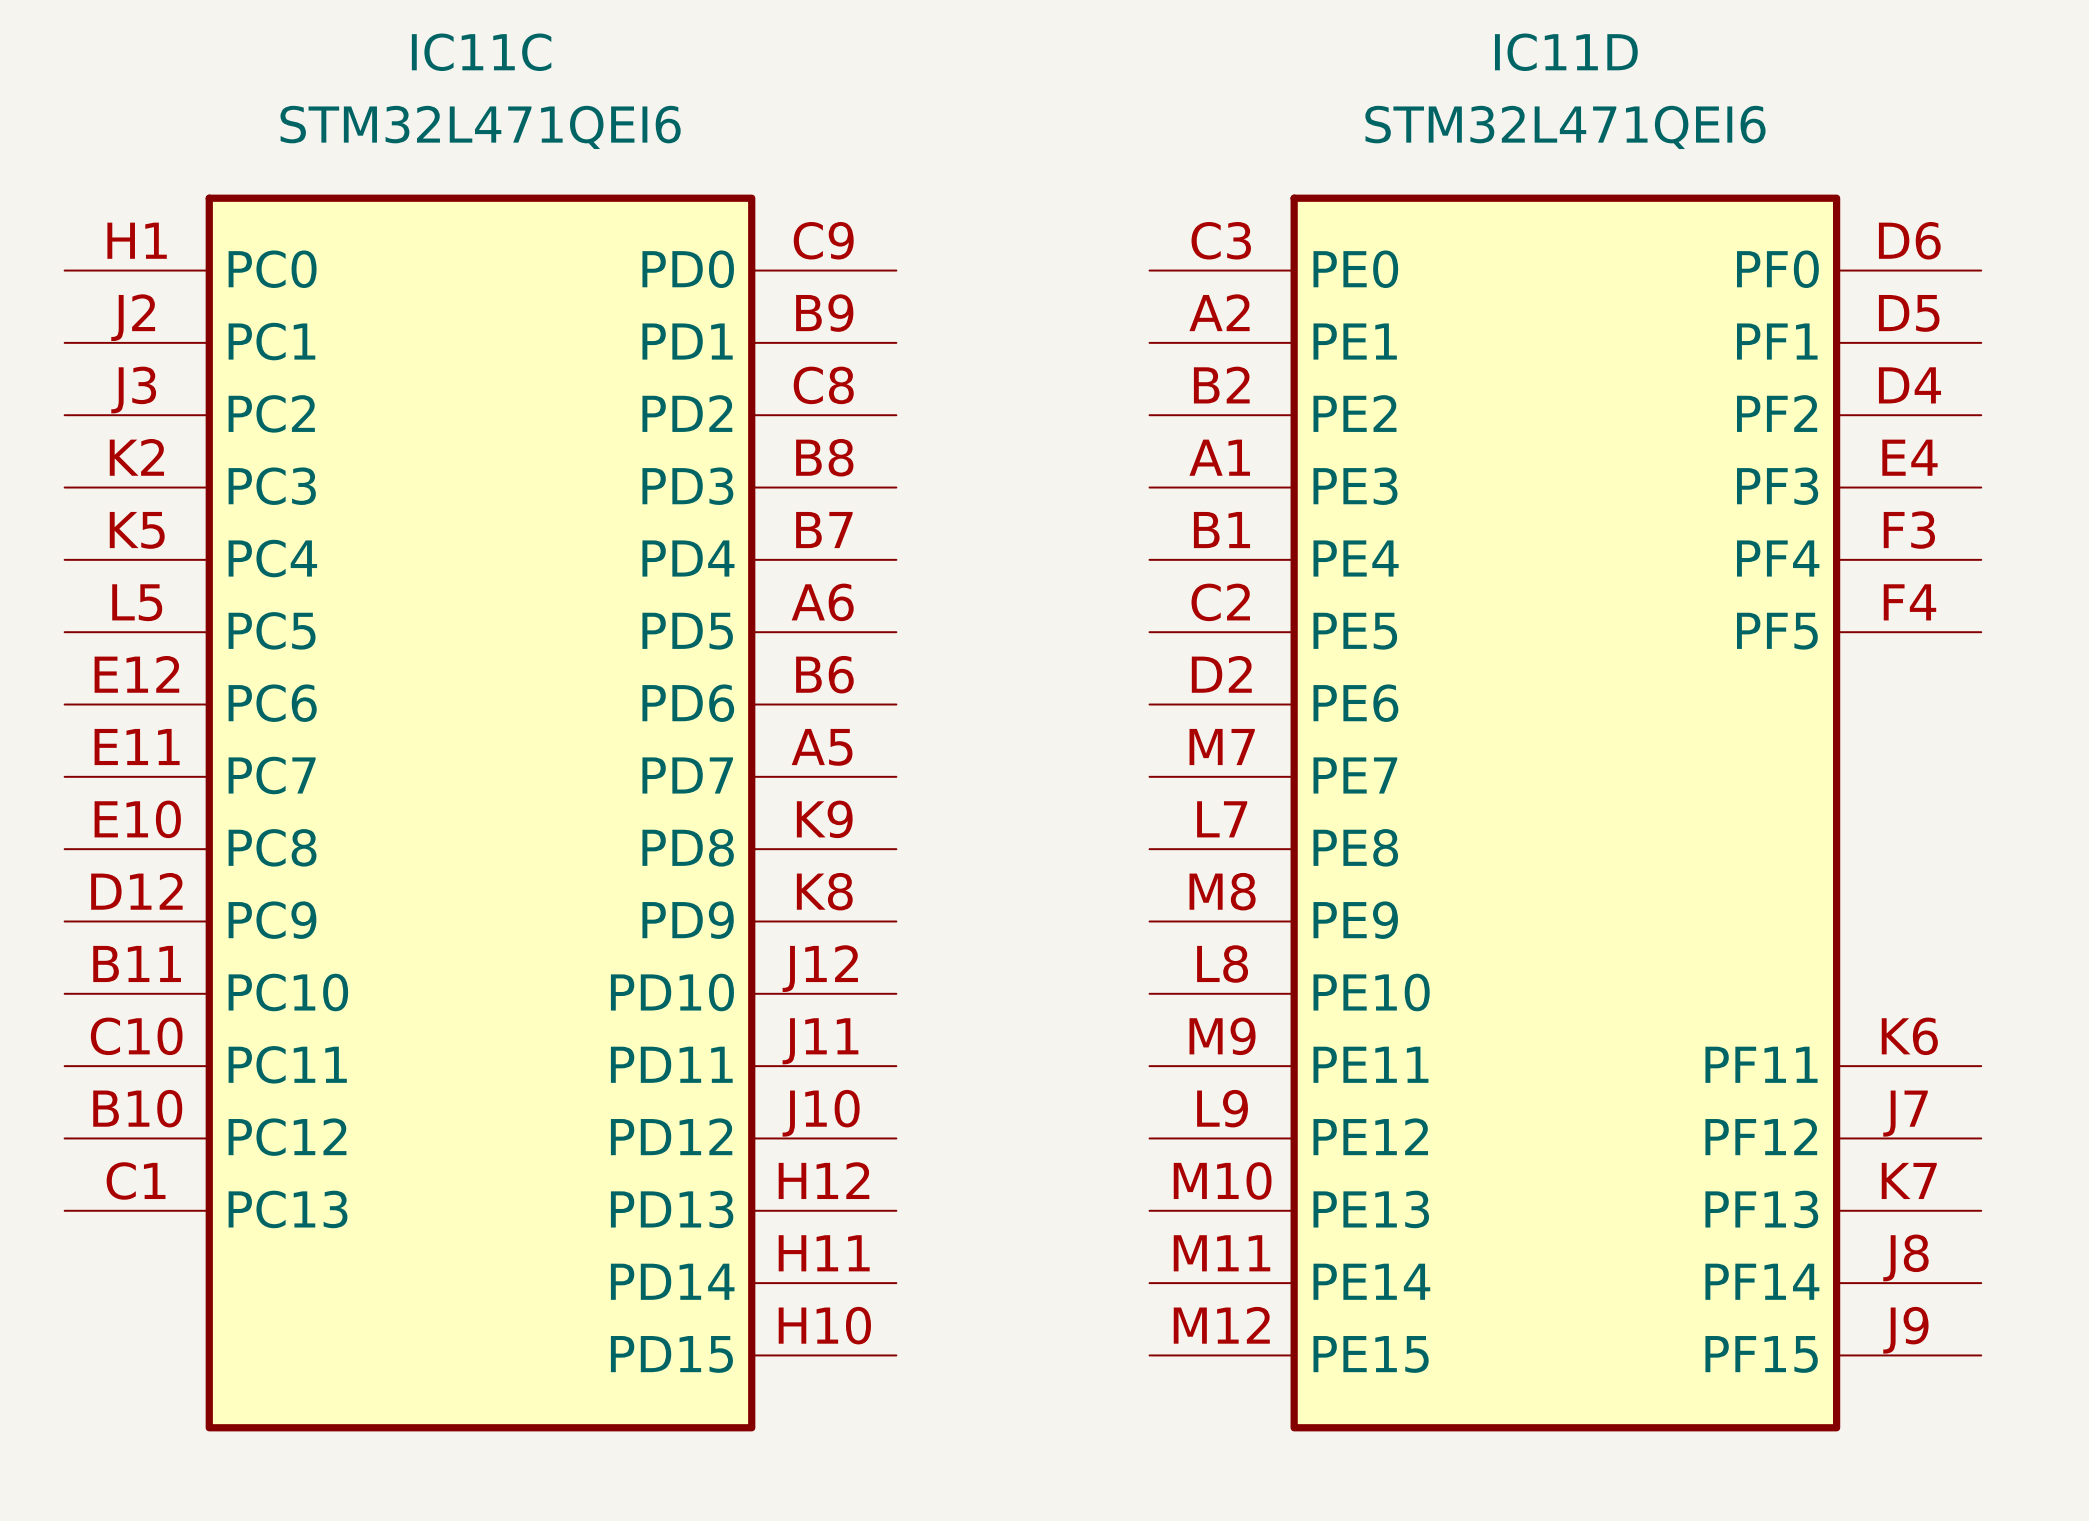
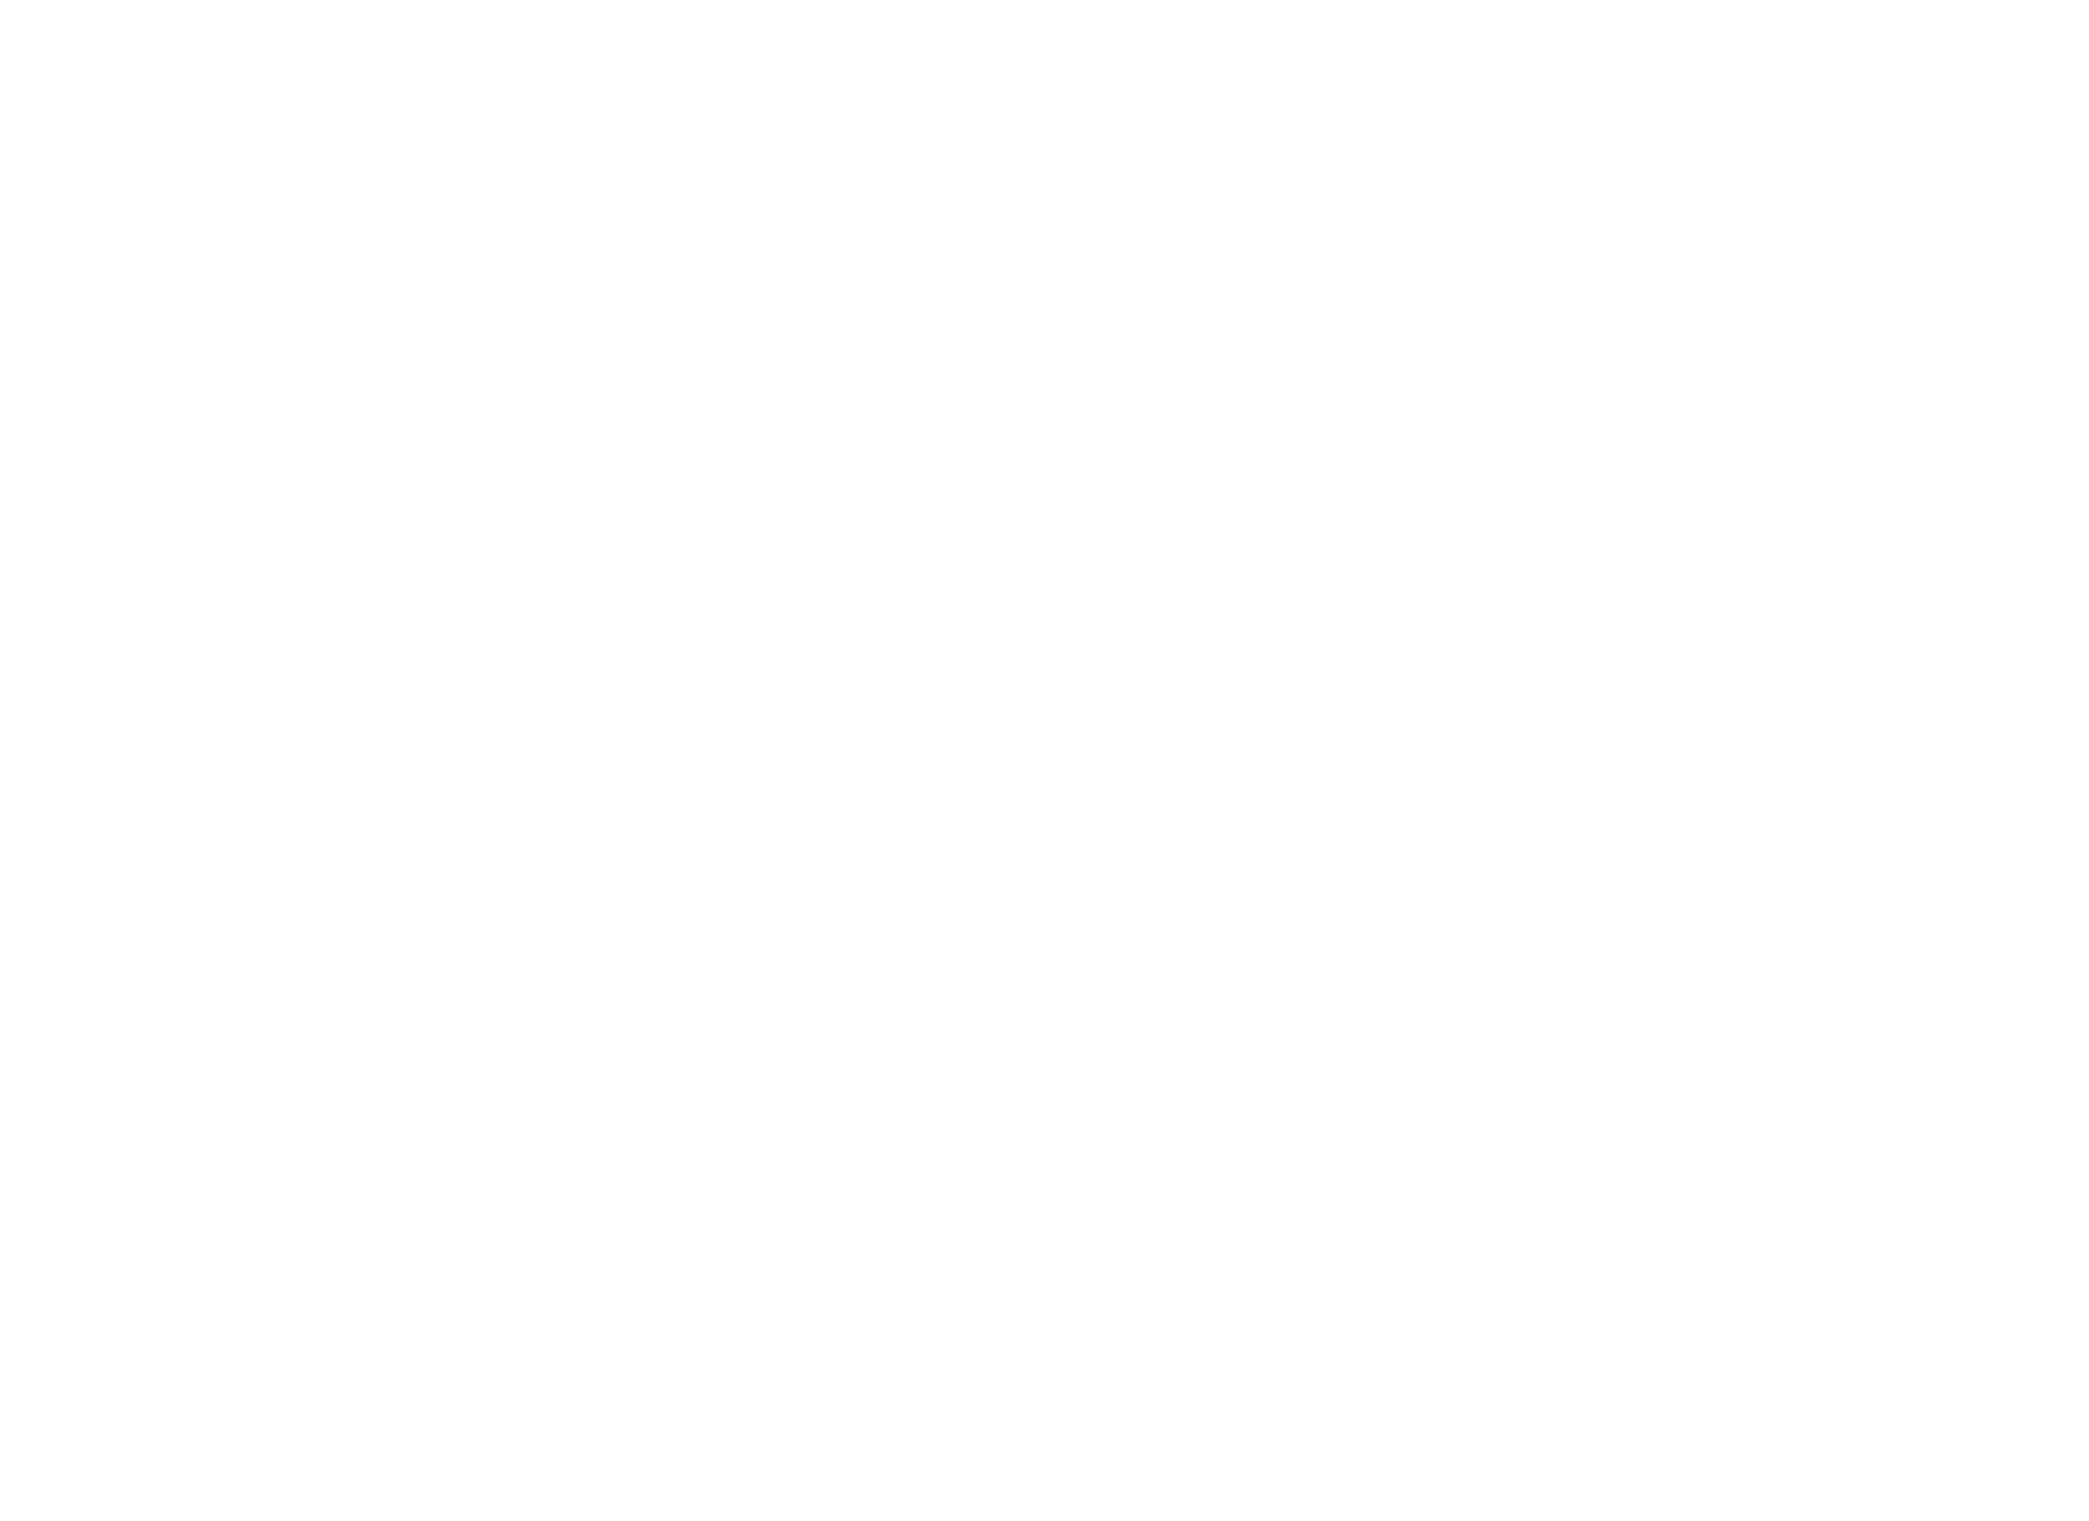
IC11C: STM32L471QEI6 (480, 812) -> none
IC11D: STM32L471QEI6 (1565, 812) -> none

